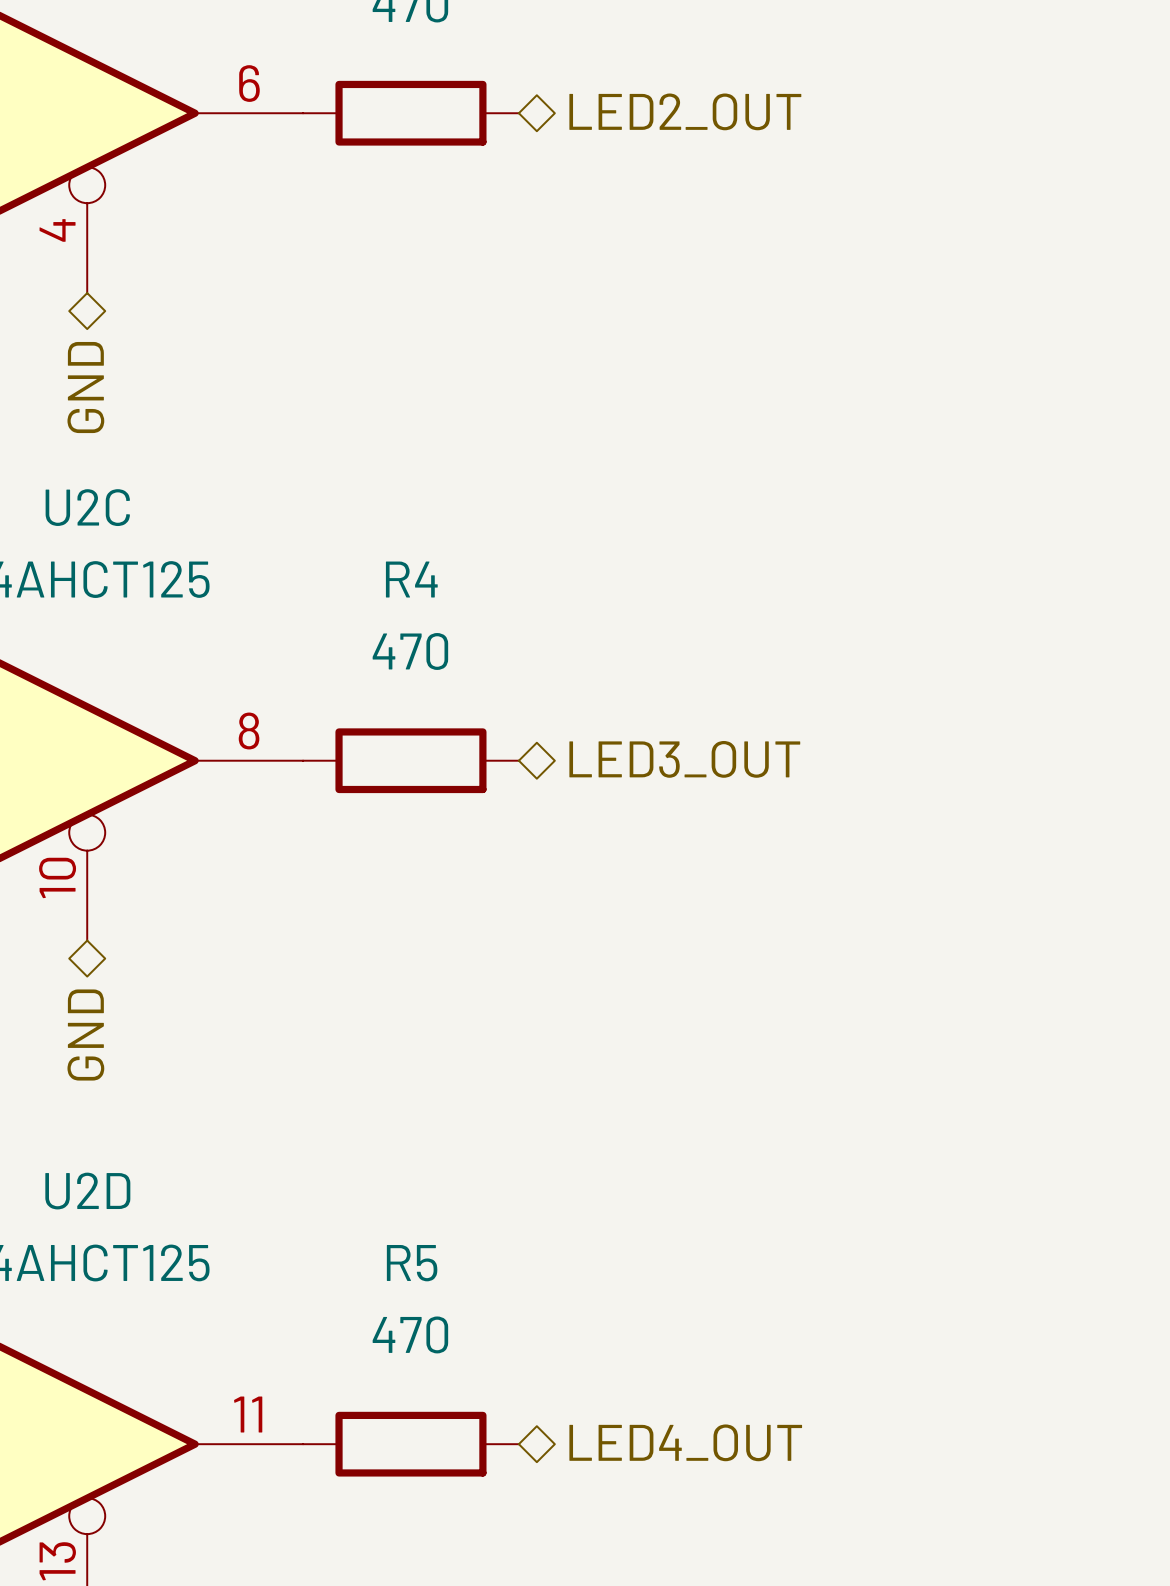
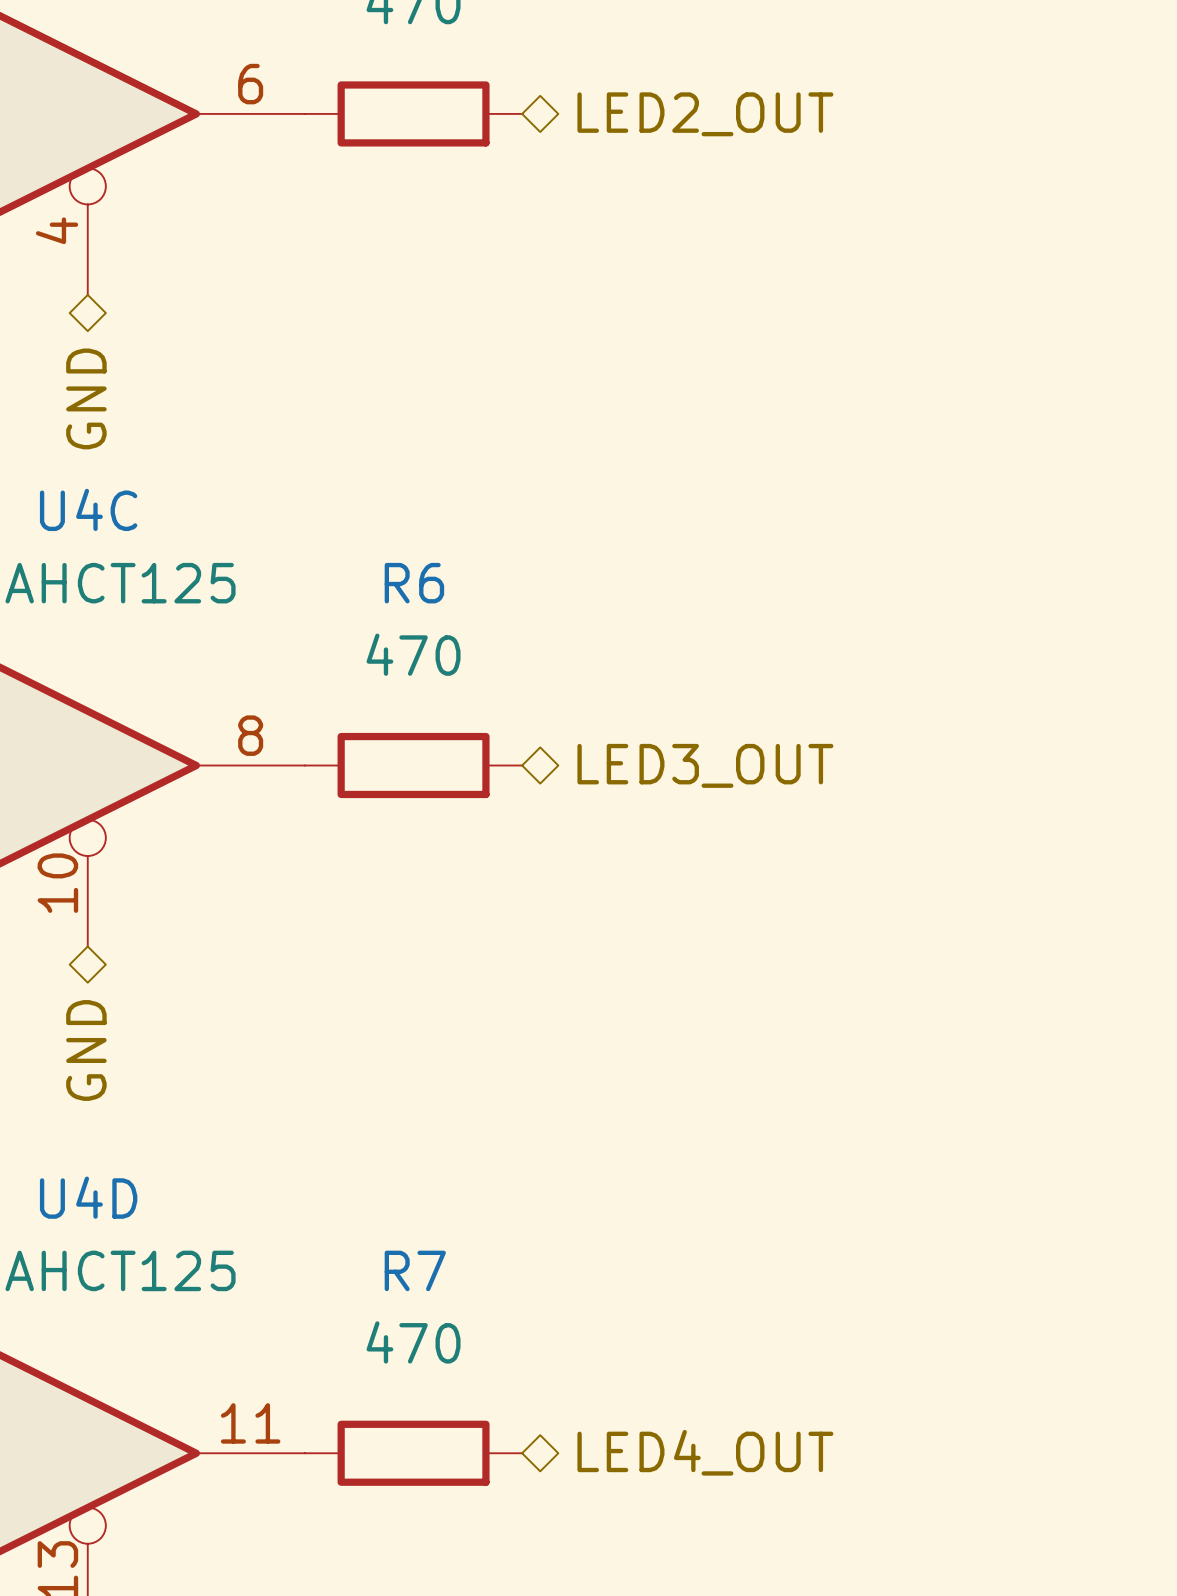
U2C name: U2C (87, 507) -> U4C (88, 509)
R4 name: R4 (411, 579) -> R6 (414, 583)
U2D name: U2D (87, 1191) -> U4D (88, 1197)
R5 name: R5 (412, 1263) -> R7 (415, 1270)

